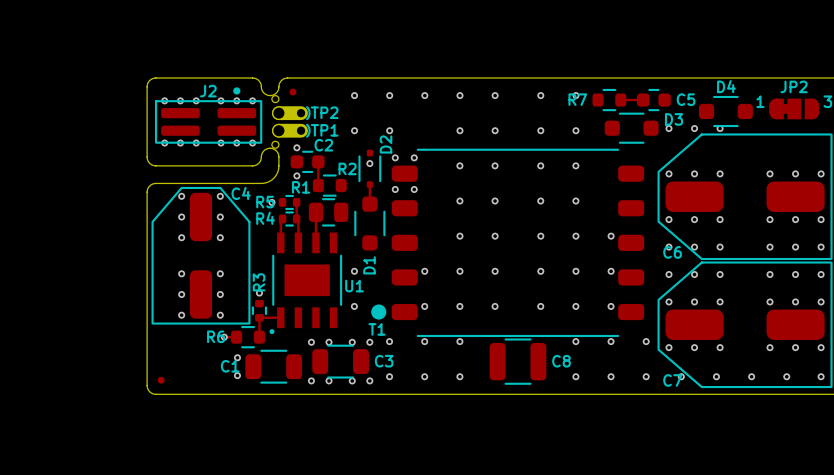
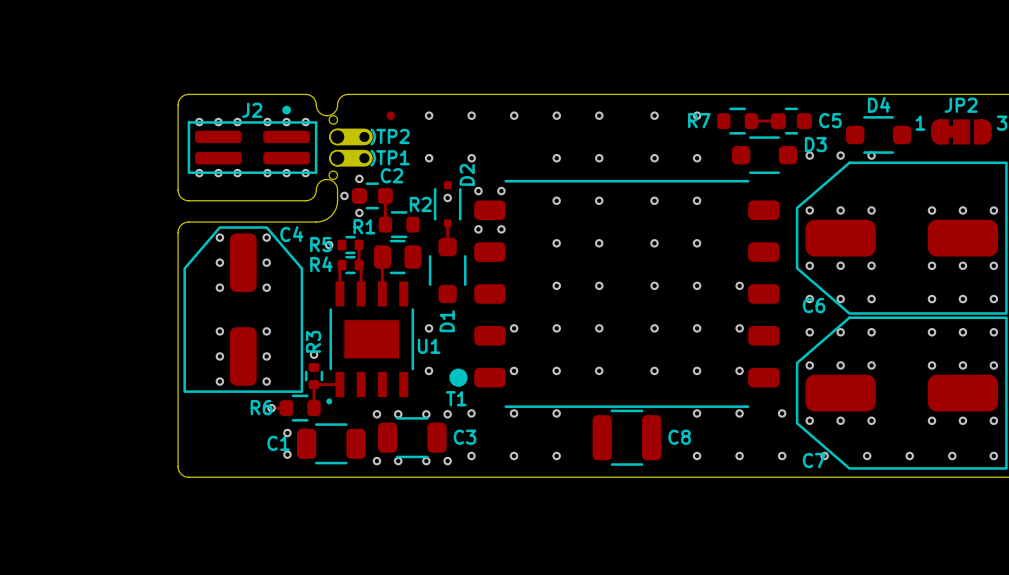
part position: (292, 92) -> (390, 115)
via: none -> (344, 195)
part: (161, 380) -> none

